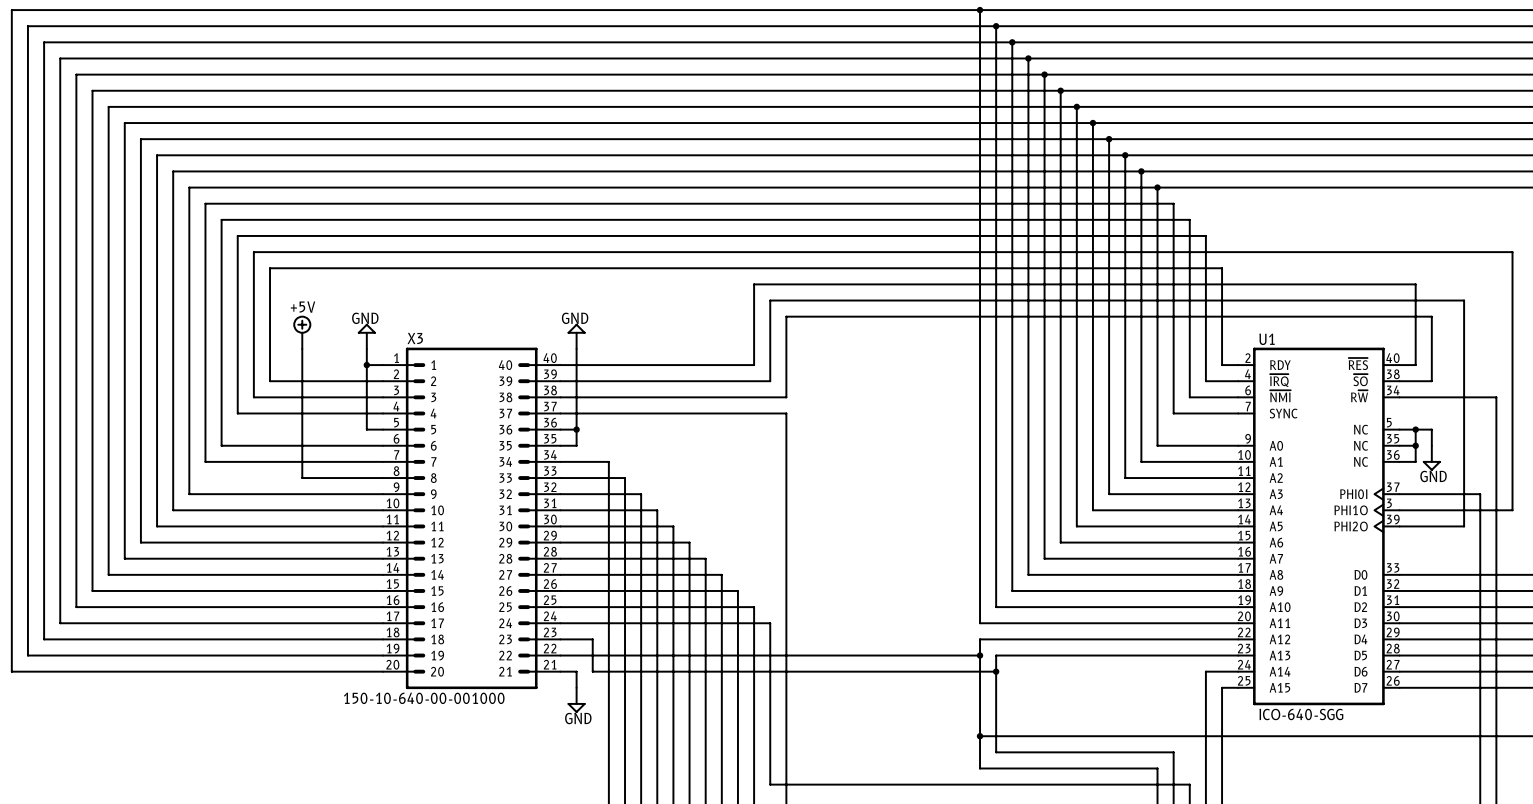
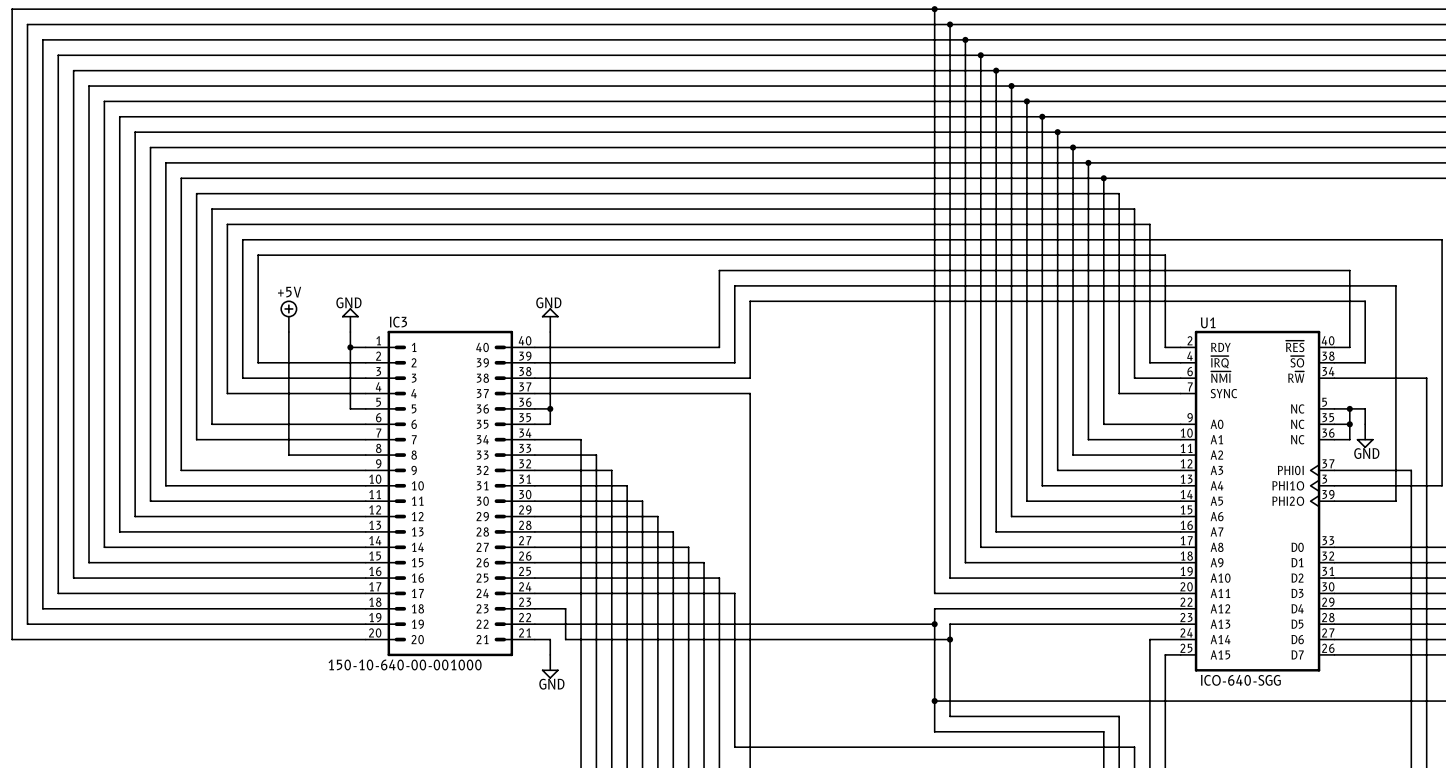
X3 name: X3 (415, 338) -> IC3 (398, 322)

